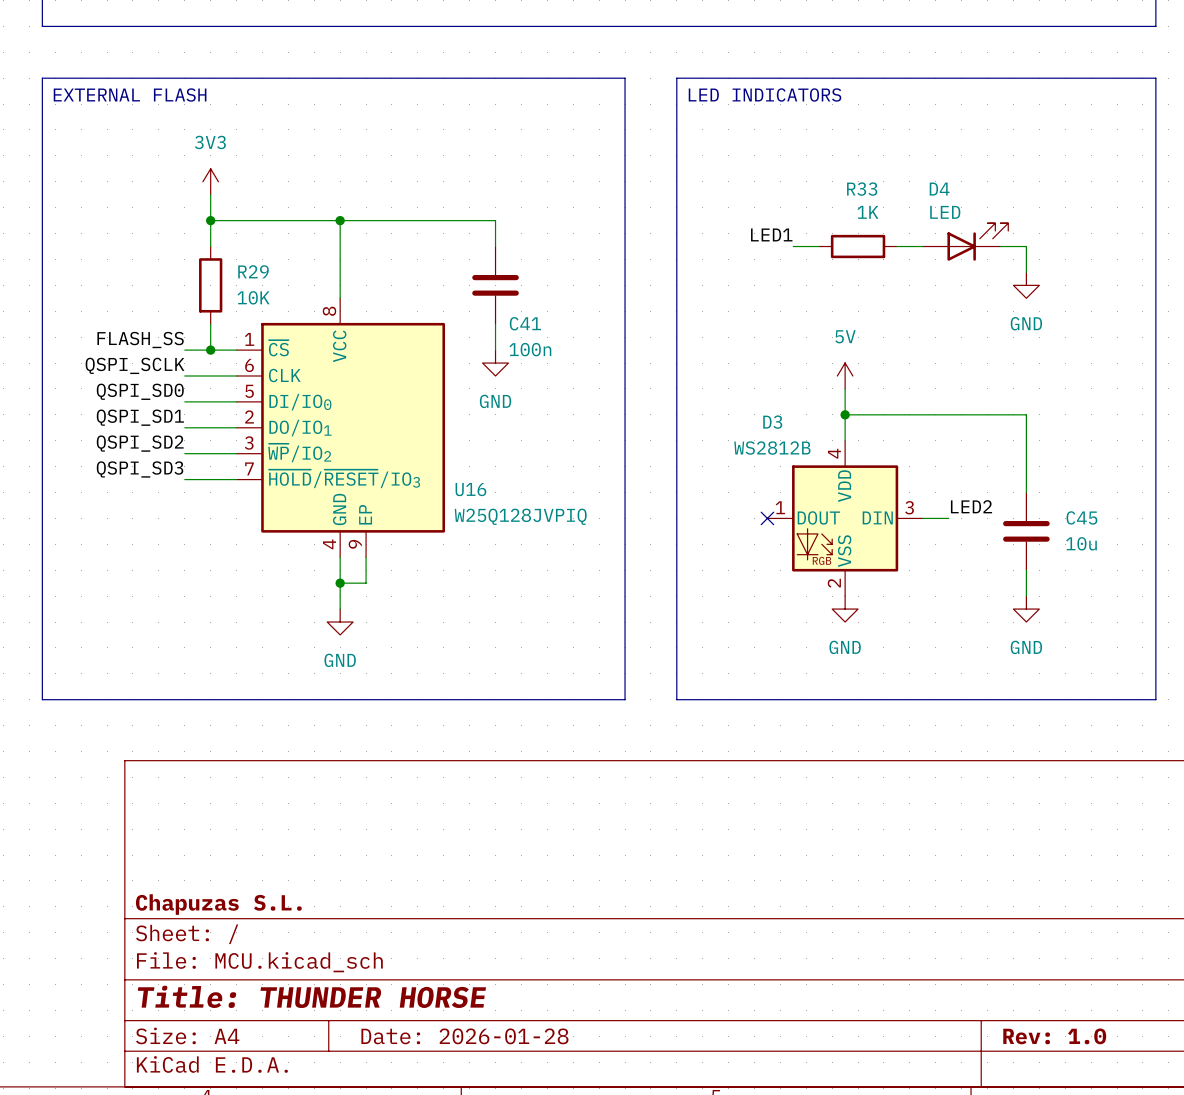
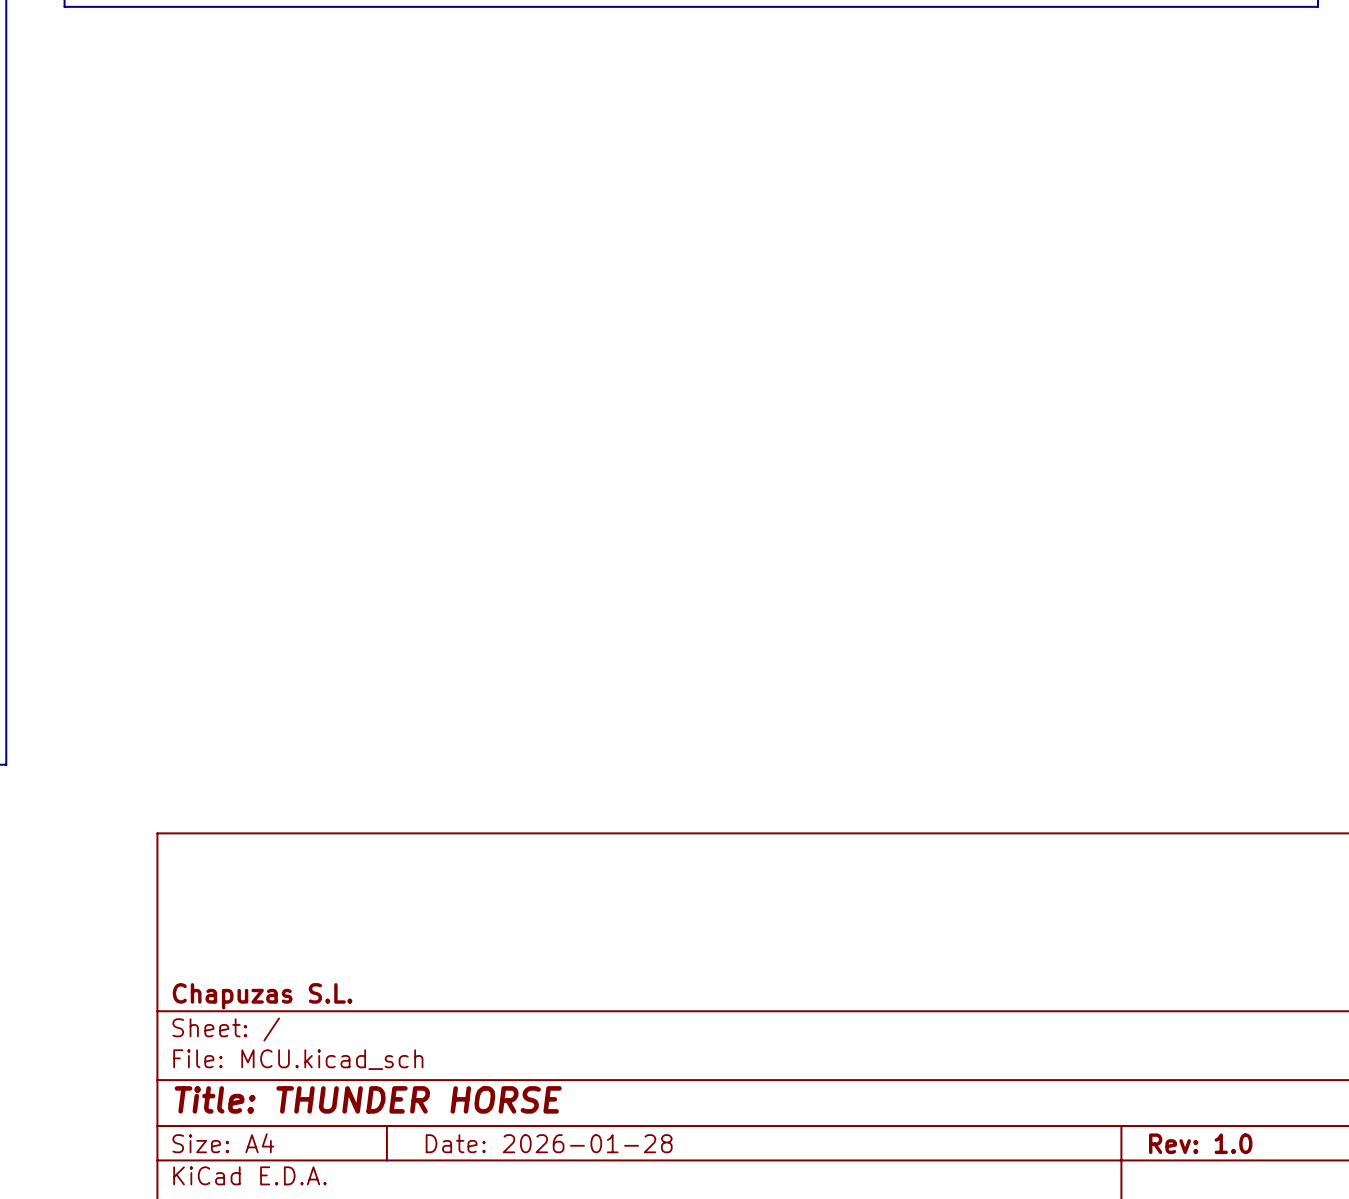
line: (42, 78) (625, 78) (625, 699) (42, 699) (42, 78) -> none
line: (676, 78) (1155, 78) (1155, 699) (676, 699) (676, 78) -> none
text: EXTERNAL FLASH (130, 95) -> none
text: LED INDICATORS (765, 95) -> none
power symbol: 3V3 (210, 181) -> none
wire: (210, 194) (210, 246) -> none
wire: (210, 220) (495, 220) (495, 246) -> none
junction: (210, 220) -> none
wire: (340, 220) (340, 298) -> none
junction: (340, 220) -> none
label: LED1 (771, 234) -> none
D4: LED (965, 241) -> none
wire: (793, 246) (819, 246) -> none
R33: 1K (858, 246) -> none
wire: (896, 246) (922, 246) -> none
wire: (1000, 246) (1026, 246) (1026, 272) -> none
R29: 10K (210, 285) -> none
C41: 100n (495, 285) -> none
power symbol: GND (1026, 285) -> none
wire: (210, 324) (210, 350) -> none
wire: (495, 324) (495, 350) -> none
label: FLASH_SS (140, 340) -> none
wire: (184, 350) (236, 350) -> none
junction: (210, 350) -> none
power symbol: GND (495, 363) -> none
label: QSPI_SCLK (135, 365) -> none
wire: (184, 376) (236, 376) -> none
power symbol: 5V (845, 376) -> none
wire: (845, 388) (845, 440) -> none
label: QSPI_SD0 (140, 391) -> none
wire: (184, 401) (236, 401) -> none
wire: (845, 414) (1026, 414) (1026, 492) -> none
junction: (845, 414) -> none
label: QSPI_SD1 (140, 417) -> none
wire: (184, 427) (236, 427) -> none
U16: W25Q128JVPIQ (340, 427) -> none
label: QSPI_SD2 (140, 443) -> none
wire: (184, 453) (236, 453) -> none
label: QSPI_SD3 (140, 469) -> none
wire: (184, 479) (236, 479) -> none
label: LED2 (971, 506) -> none
no-connect mark: (767, 518) -> none
D3: WS2812B (845, 518) -> none
wire: (922, 518) (948, 518) -> none
C45: 10u (1026, 531) -> none
wire: (340, 557) (340, 609) -> none
wire: (366, 557) (366, 583) (340, 583) -> none
wire: (1026, 570) (1026, 596) -> none
junction: (340, 583) -> none
power symbol: GND (845, 609) -> none
power symbol: GND (1026, 609) -> none
power symbol: GND (340, 622) -> none

